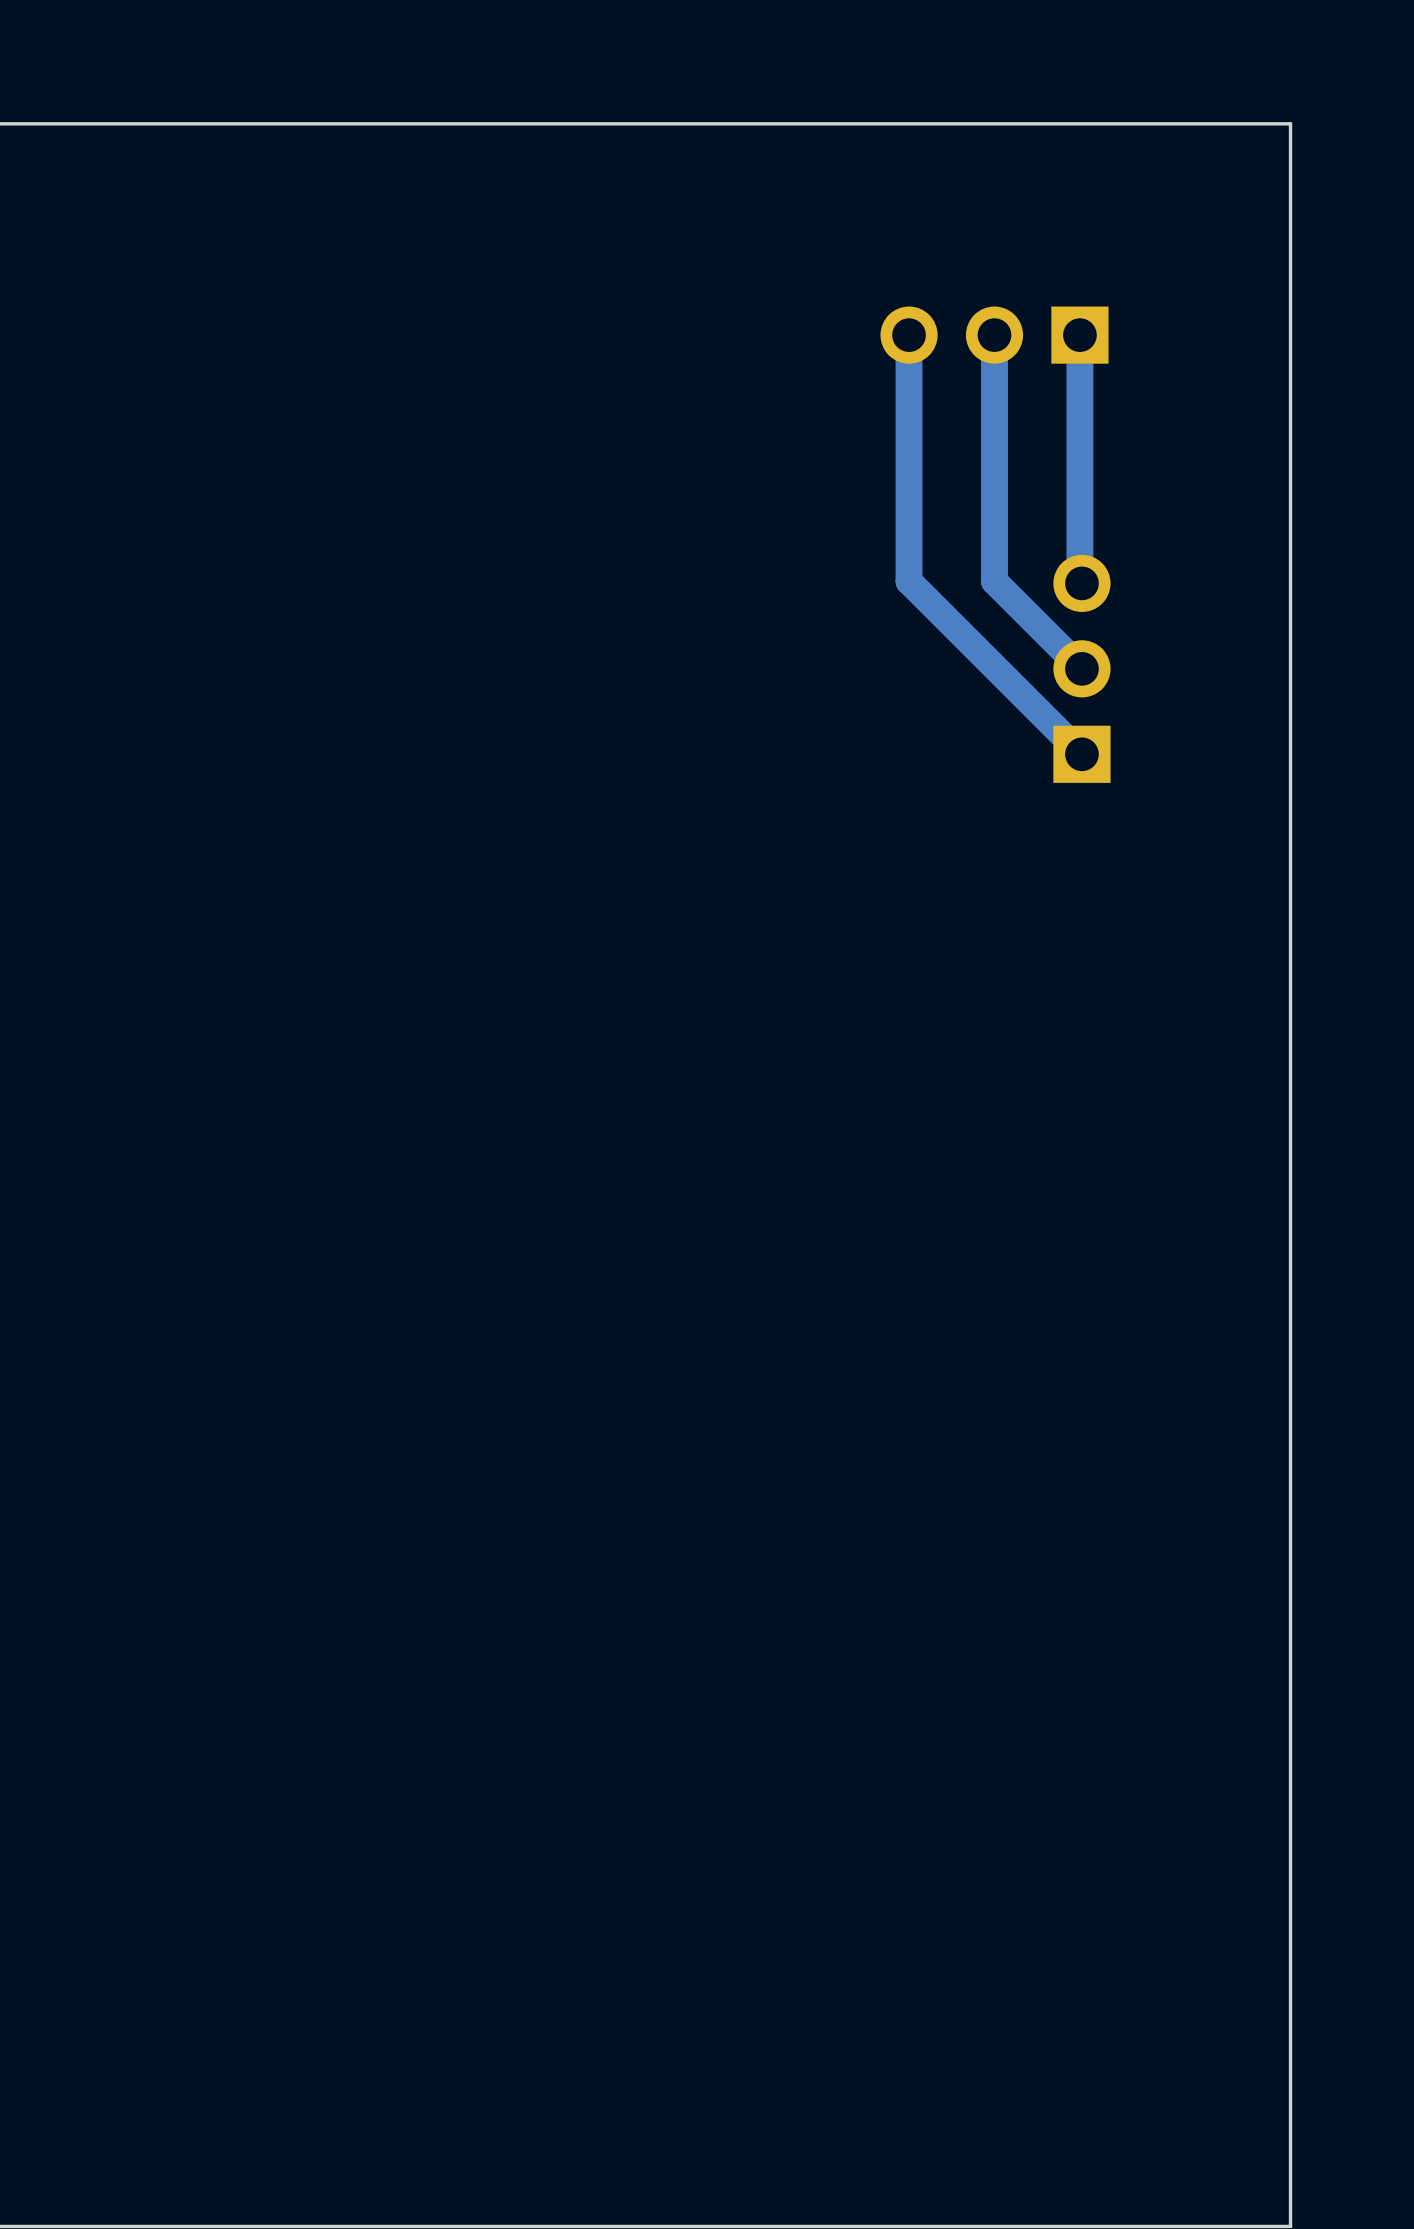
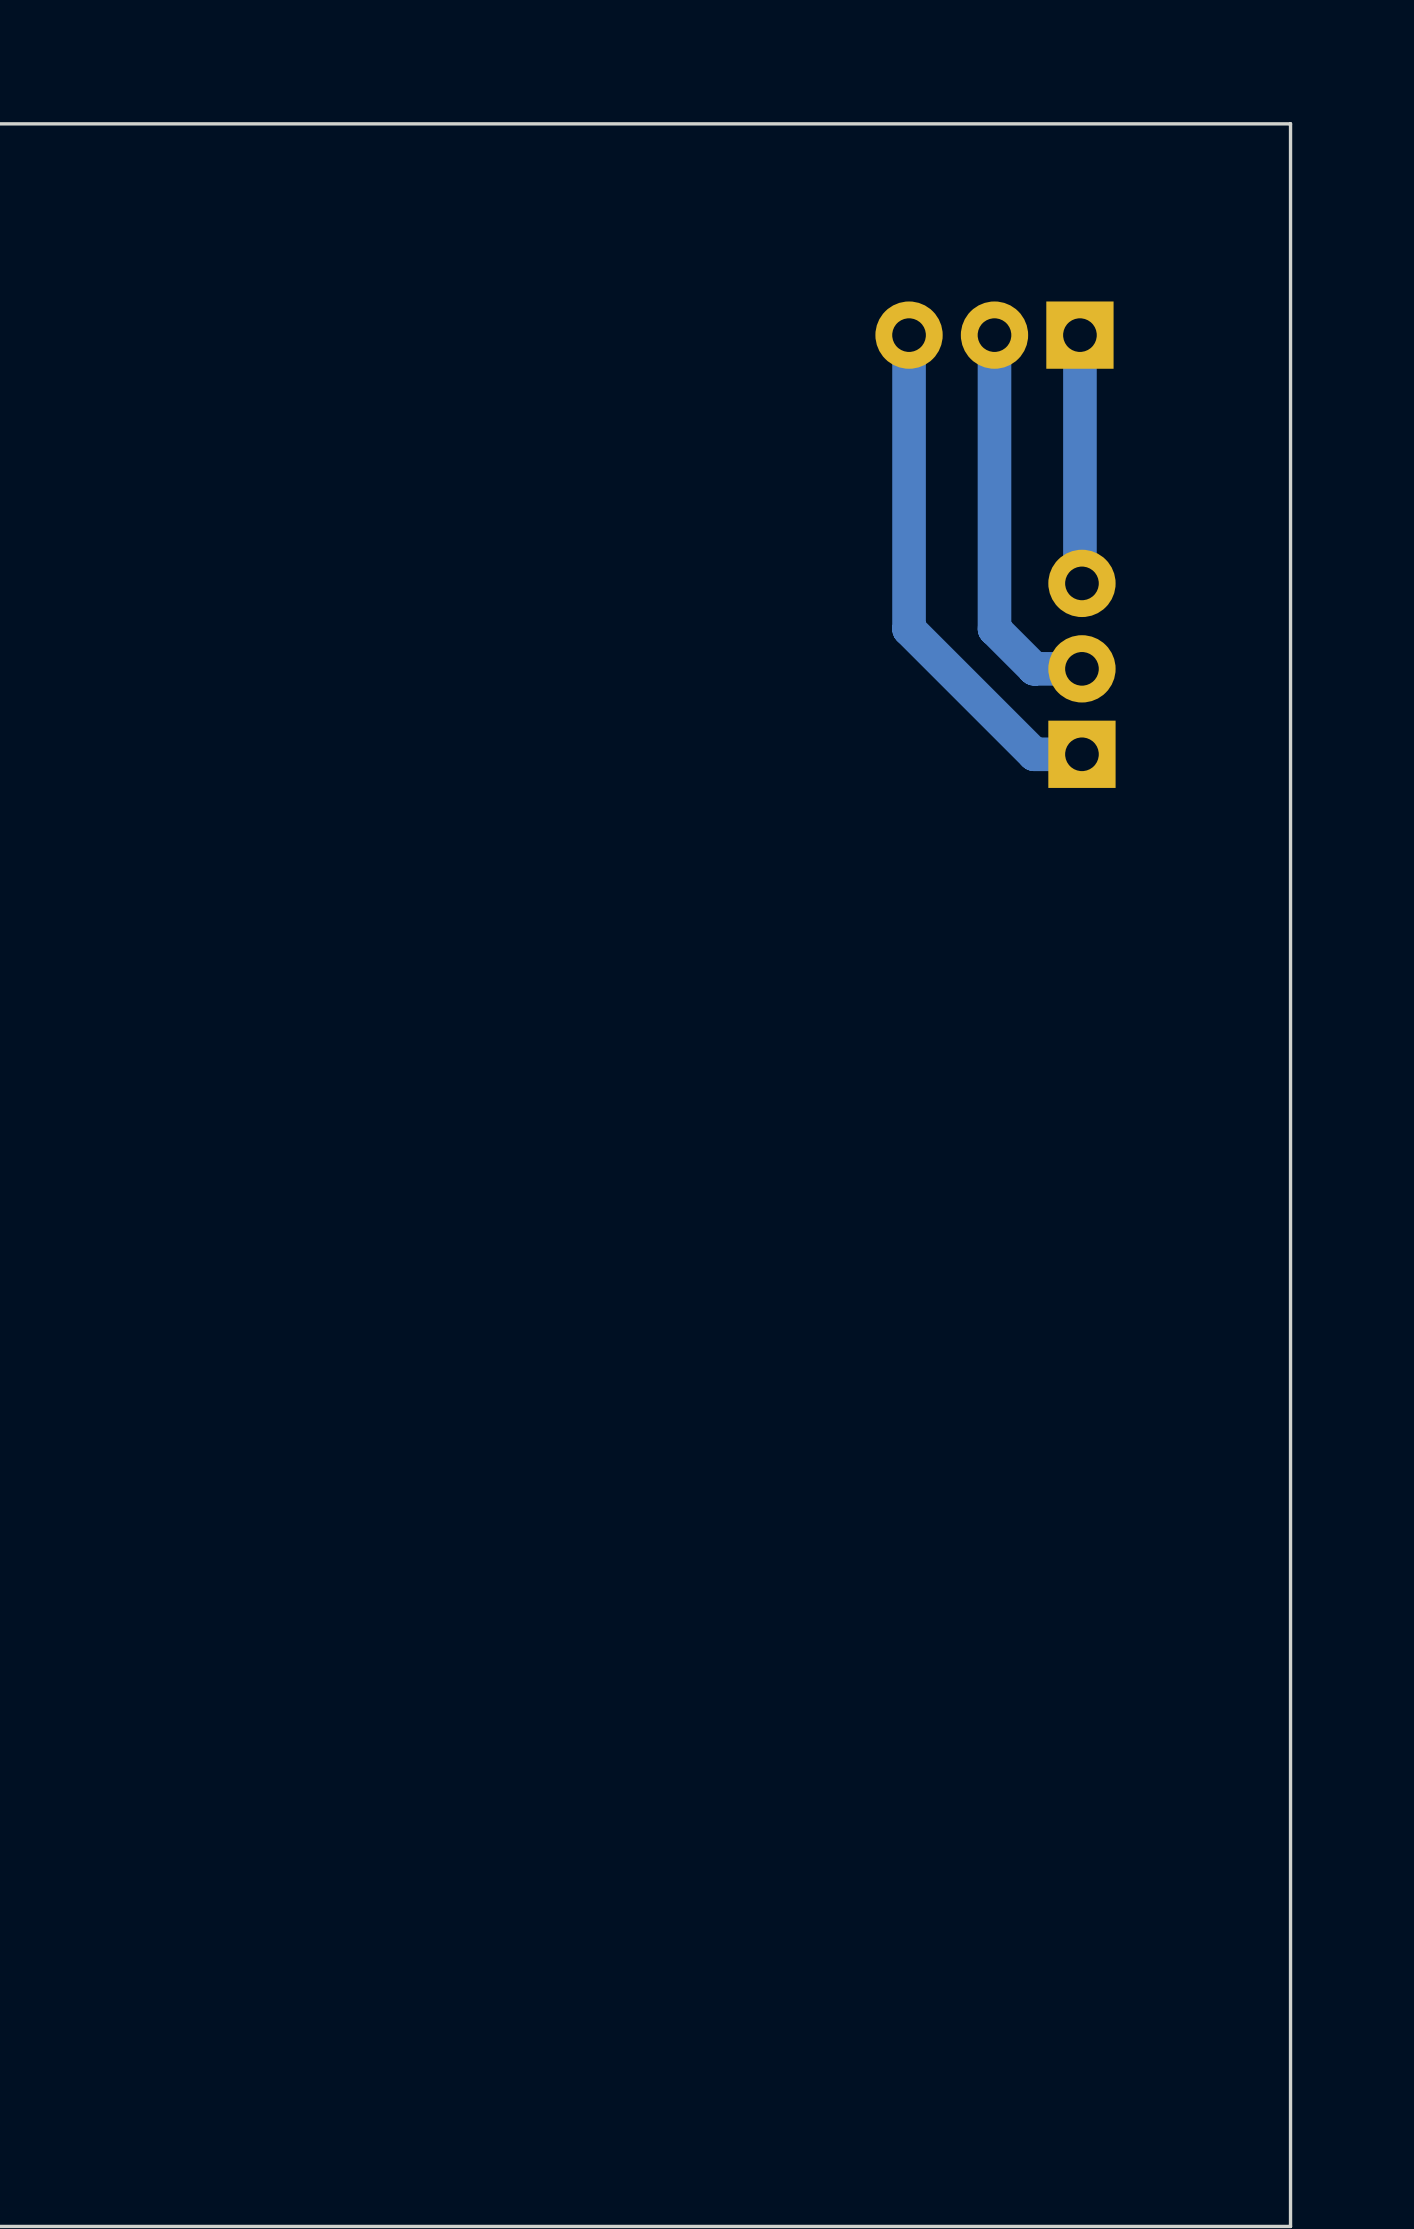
part footprint: [880, 306, 1109, 364] -> [875, 301, 1114, 369]
bottom track width: thin (909, 335) (909, 581) -> thick (909, 335) (909, 581)
bottom track width: thin (994, 335) (994, 581) -> thick (994, 335) (994, 581)
bottom track width: thin (1079, 335) (1079, 581) (1081, 583) -> thick (1079, 335) (1079, 581) (1081, 583)
part footprint: [1053, 554, 1111, 783] -> [1048, 549, 1116, 788]
bottom track: (909, 581) (1081, 754) -> (909, 581) (909, 629) (1034, 754) (1081, 754)
bottom track: (994, 581) (1081, 668) -> (994, 581) (994, 628) (1034, 668) (1081, 668)

